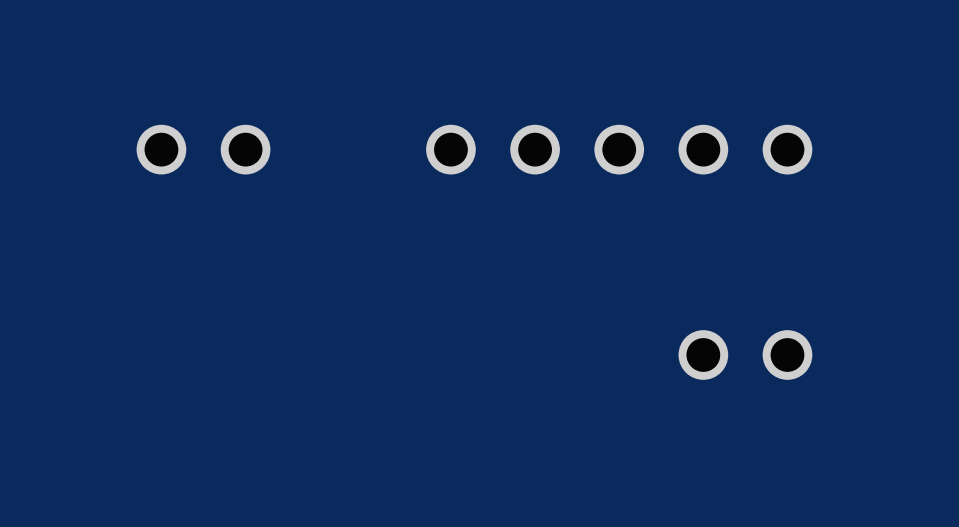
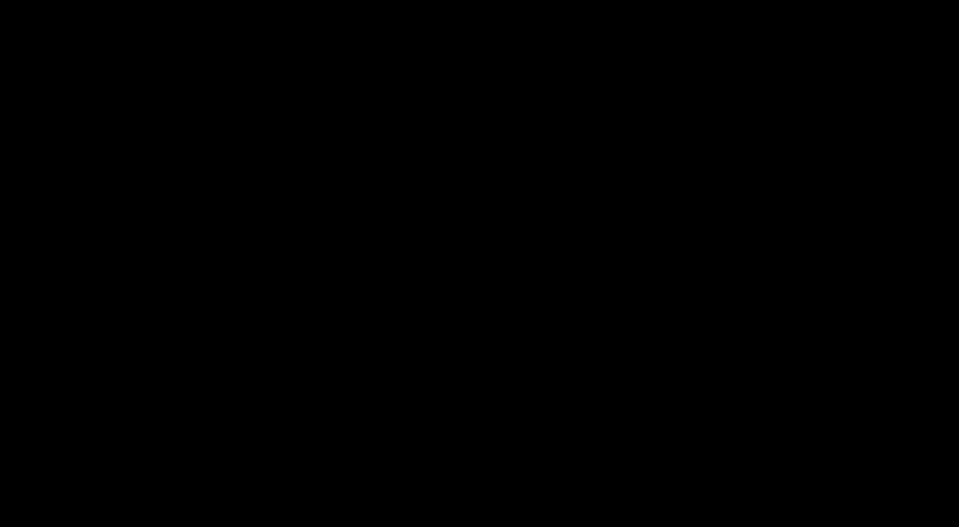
part: (203, 149) -> none
part: (619, 149) -> none
part: (745, 355) -> none

